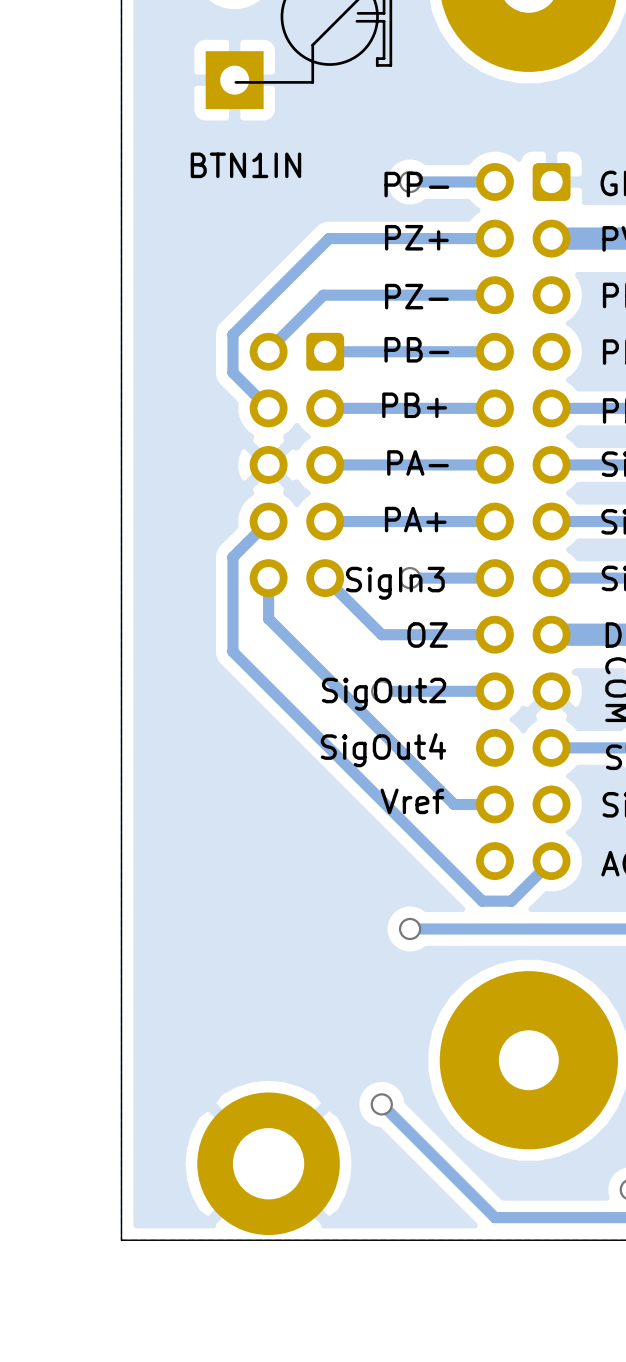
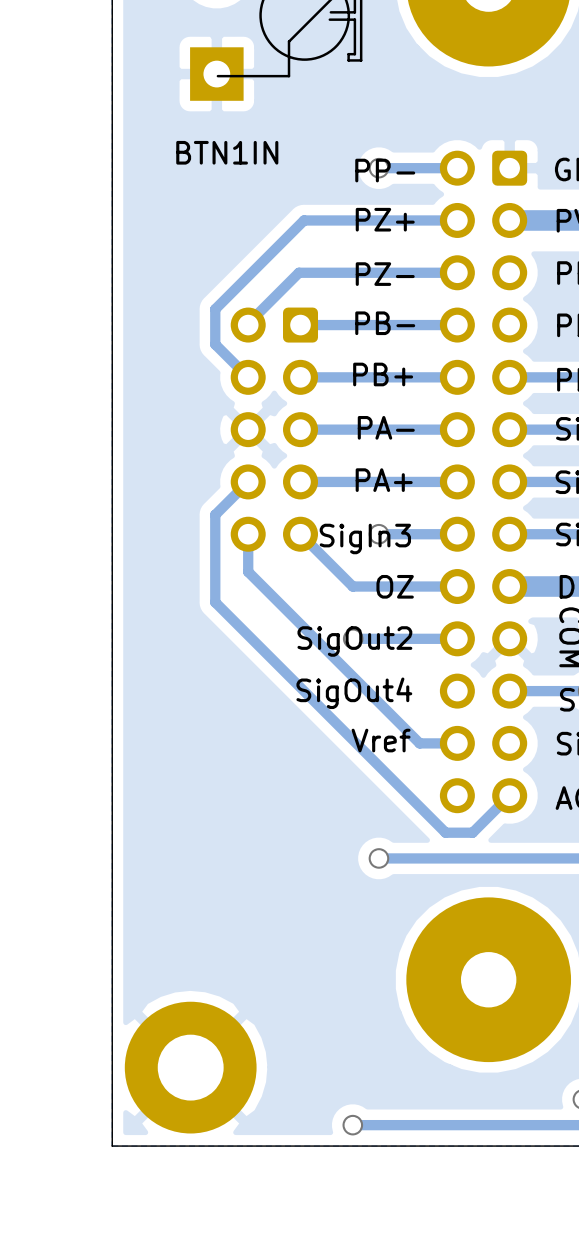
track: (381, 1104) (494, 1217) -> (353, 1124) (457, 1125)
via position: (381, 1104) -> (352, 1125)
part position: (268, 1163) -> (190, 1067)

